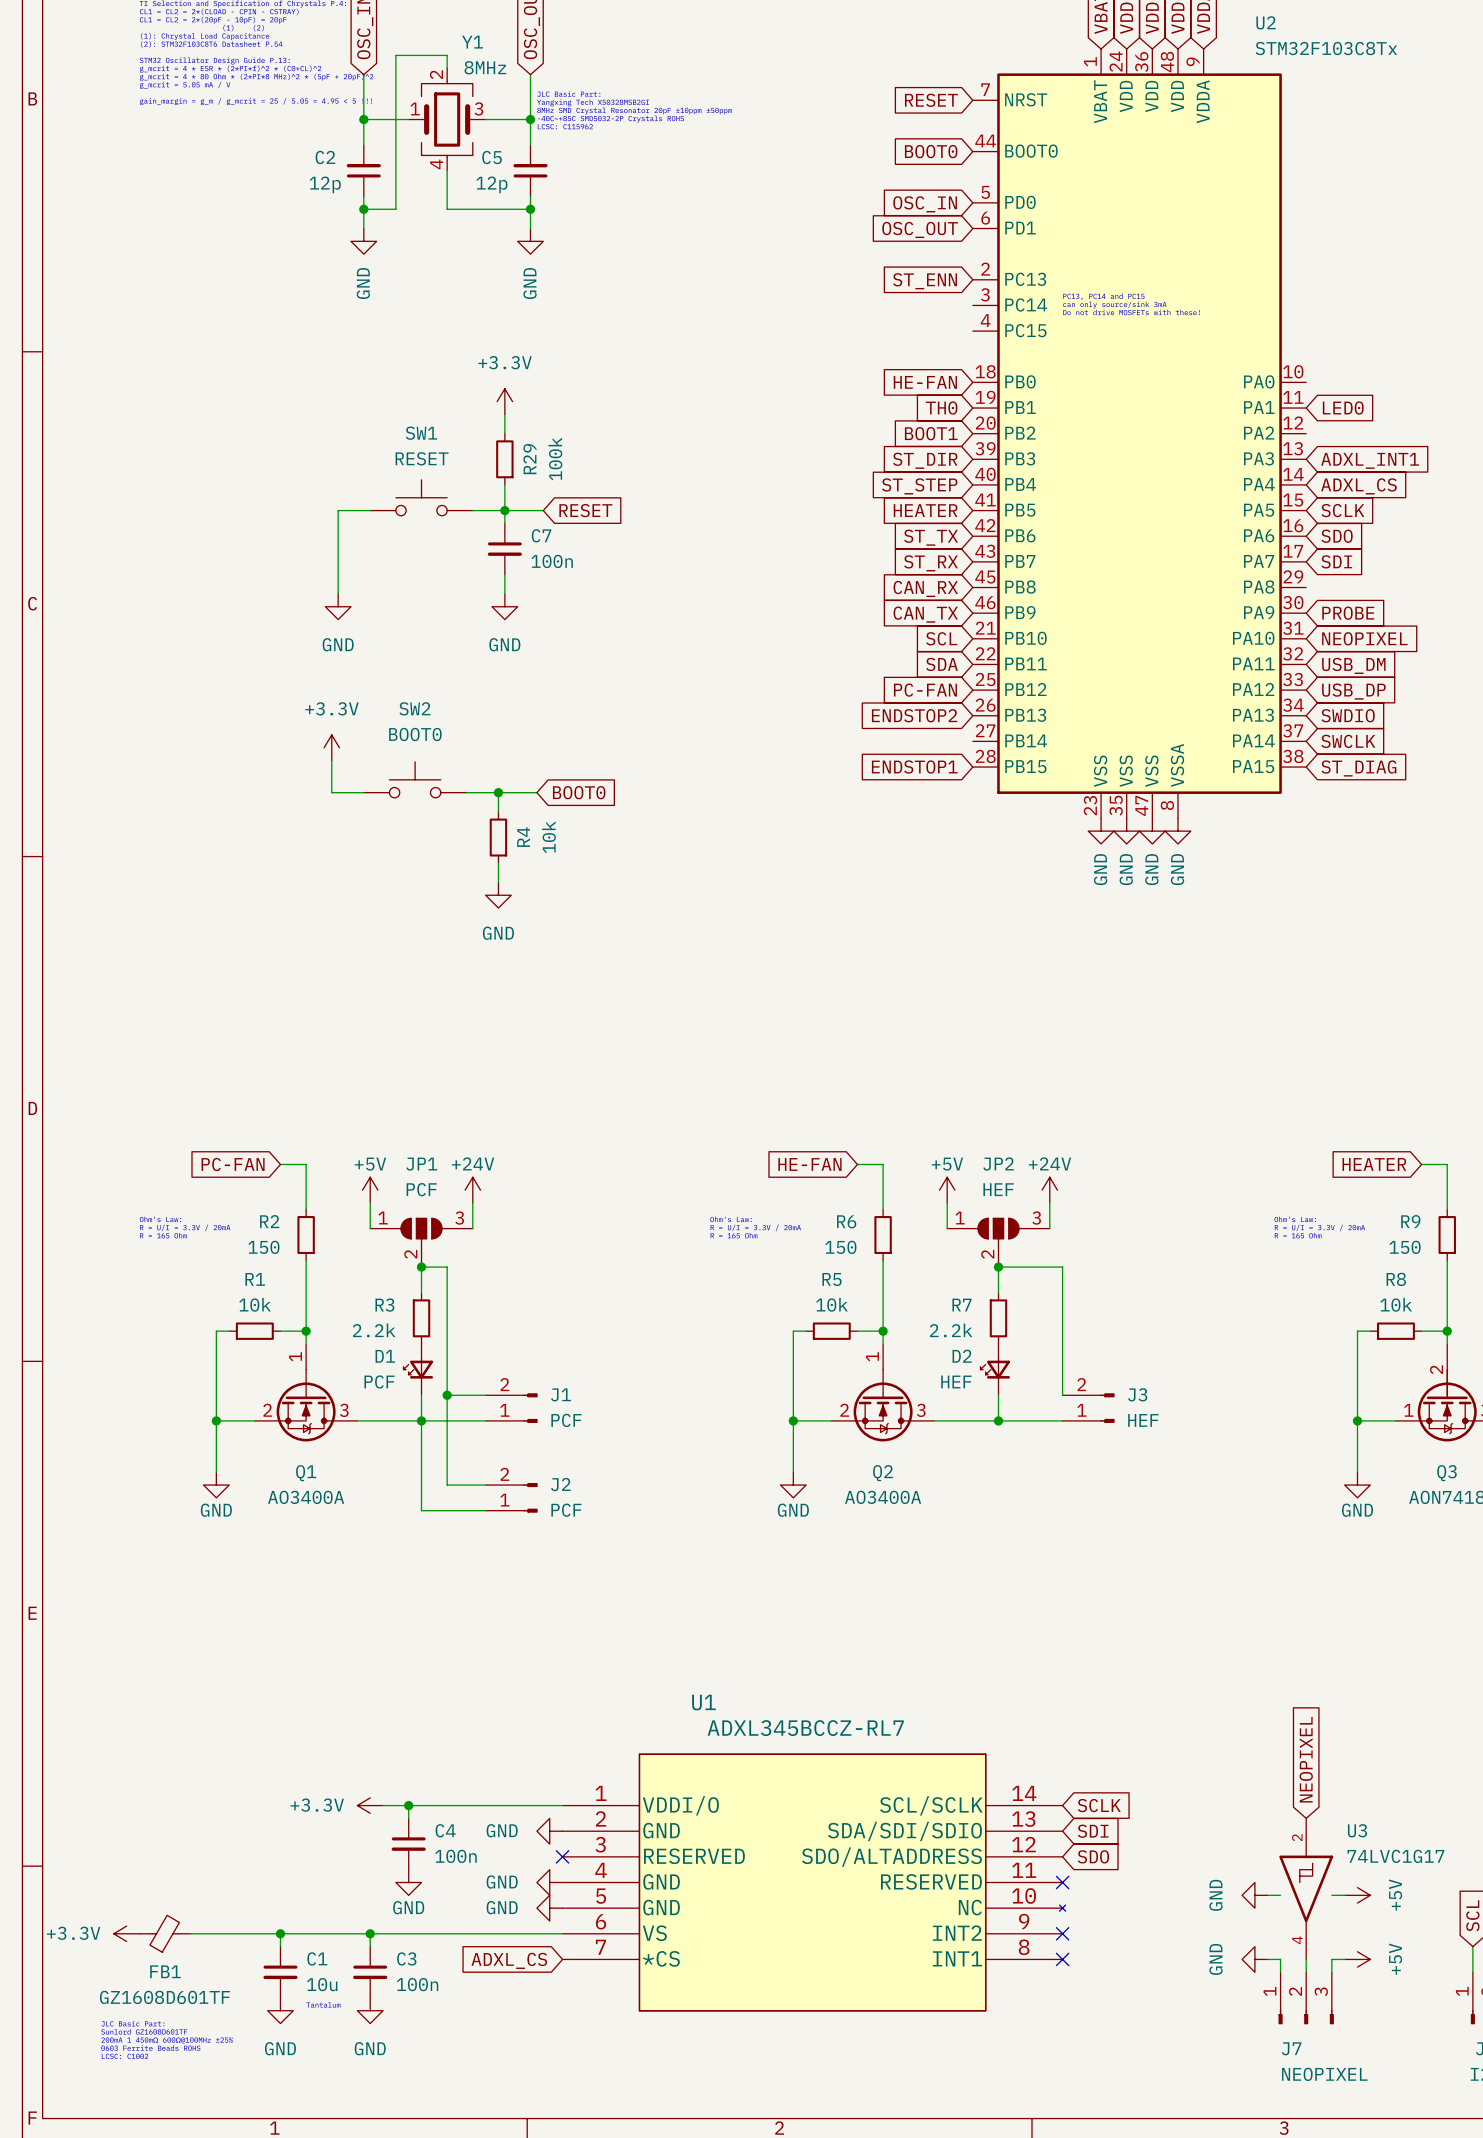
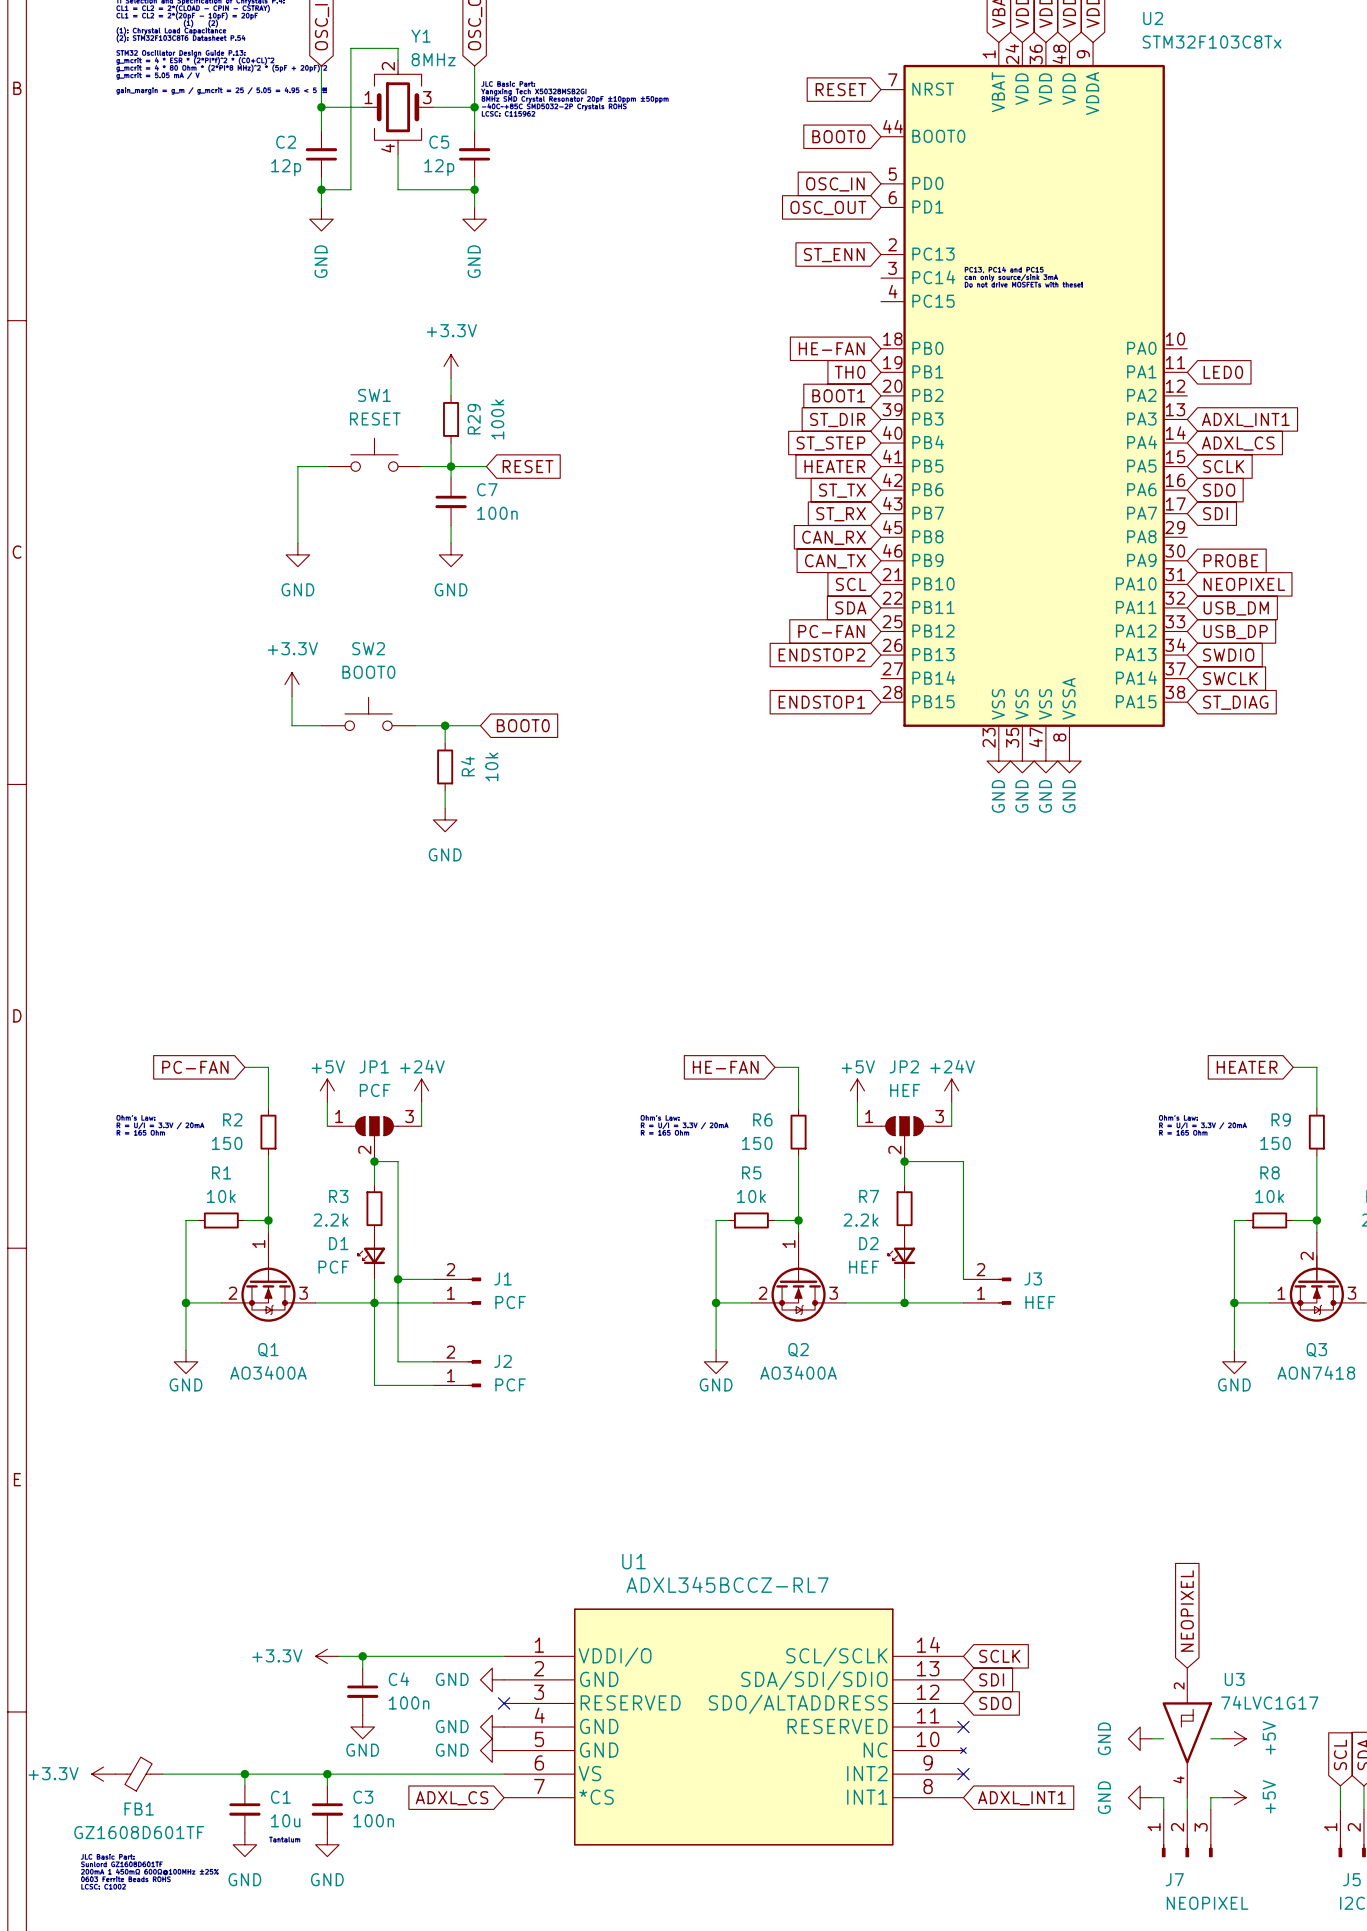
no-connect mark: (1062, 1959) -> none
global label: none -> ADXL_INT1 (1021, 1798)

